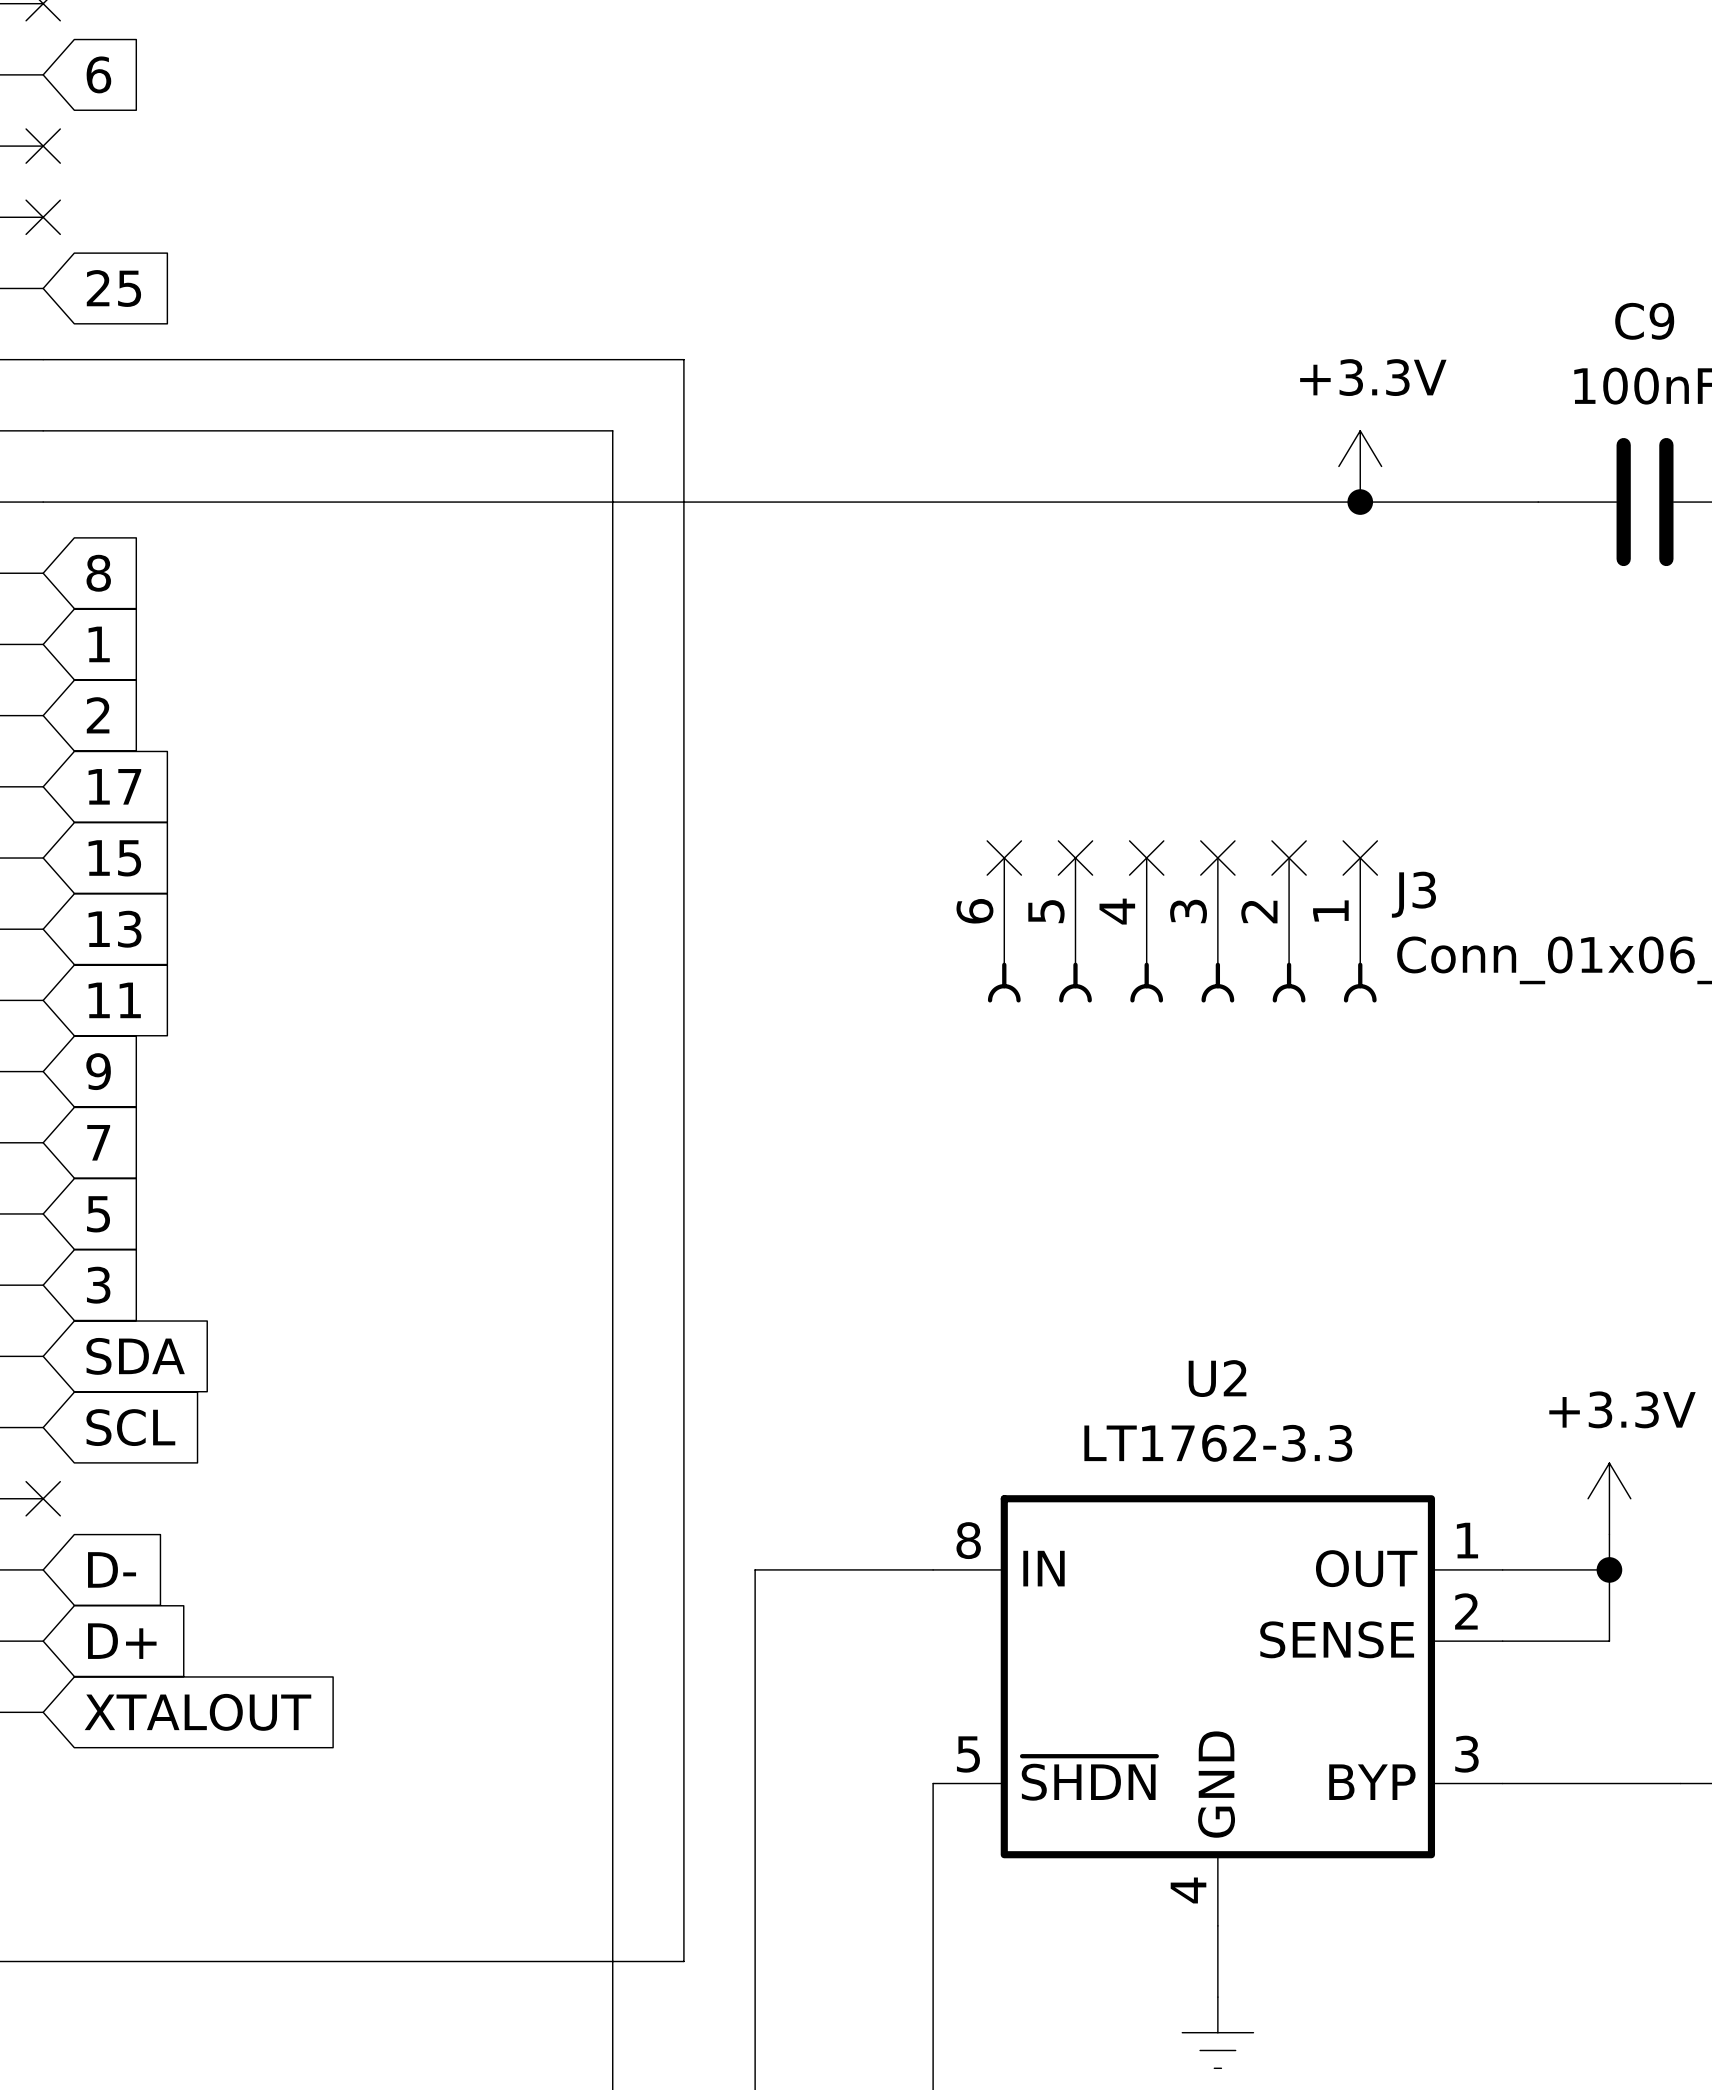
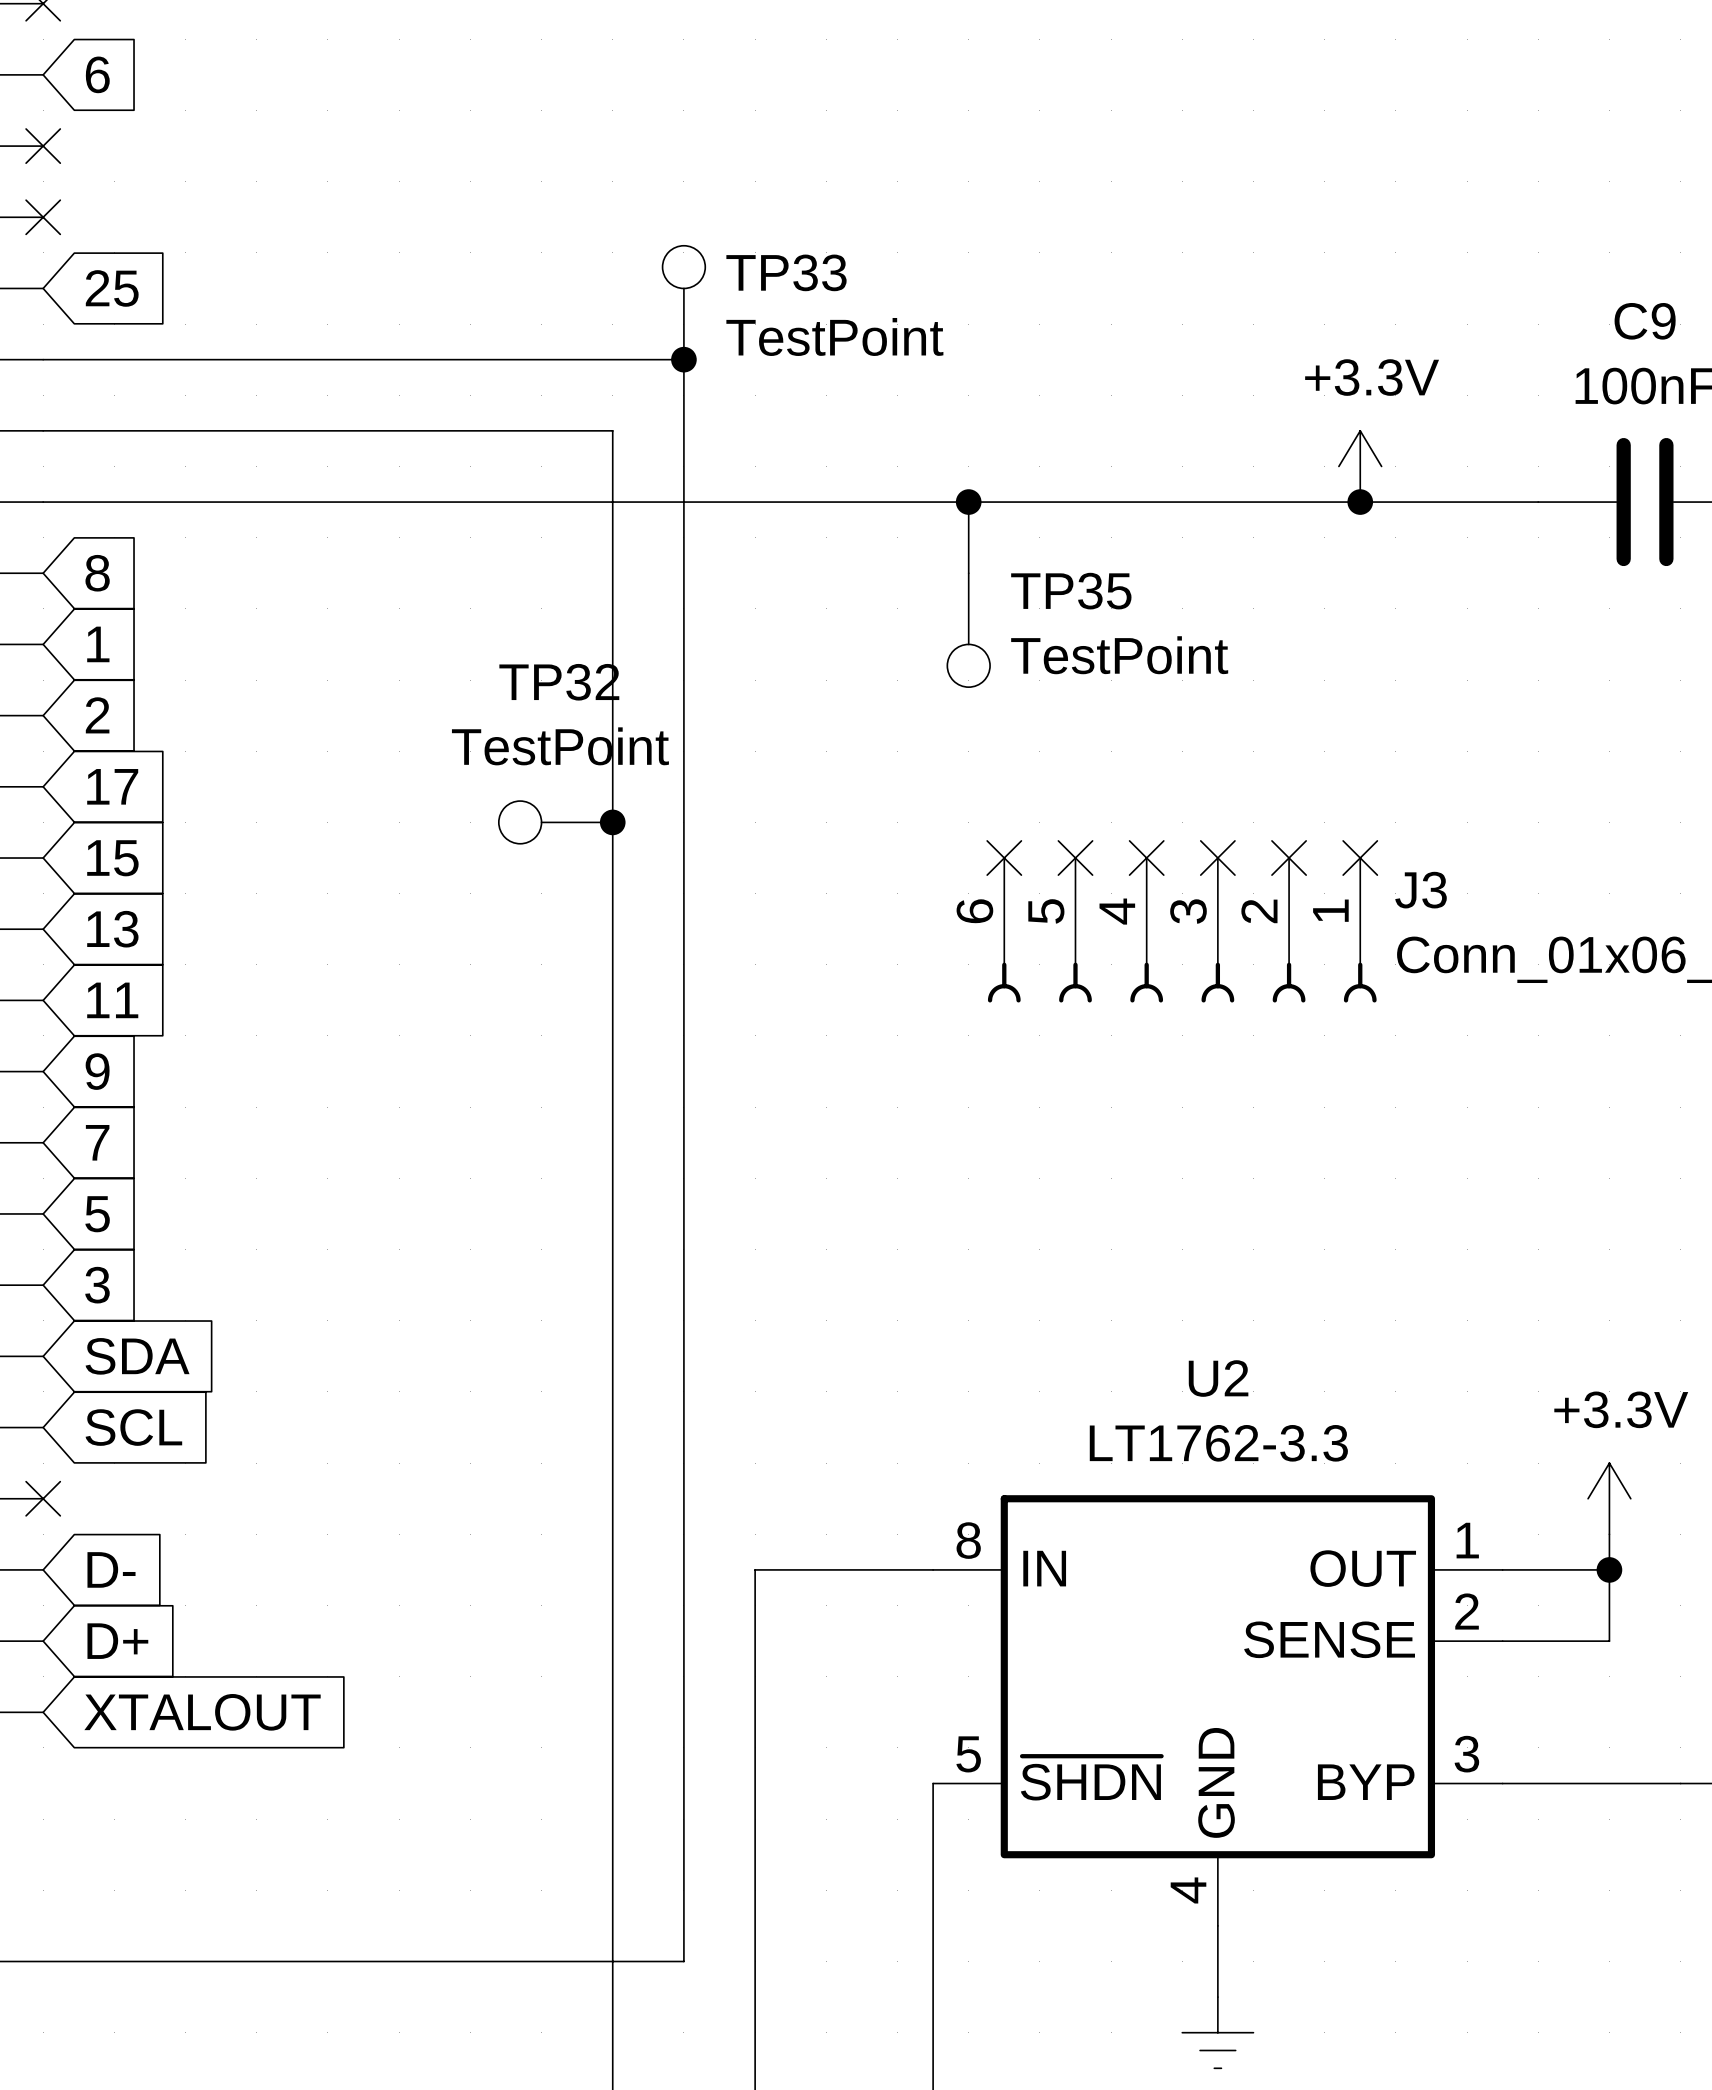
TP33: none -> TestPoint (683, 302)
junction: none -> (683, 359)
wire: none -> (968, 502) (968, 573)
junction: none -> (968, 502)
TP35: none -> TestPoint (968, 630)
TP32: none -> TestPoint (555, 822)
junction: none -> (612, 822)

